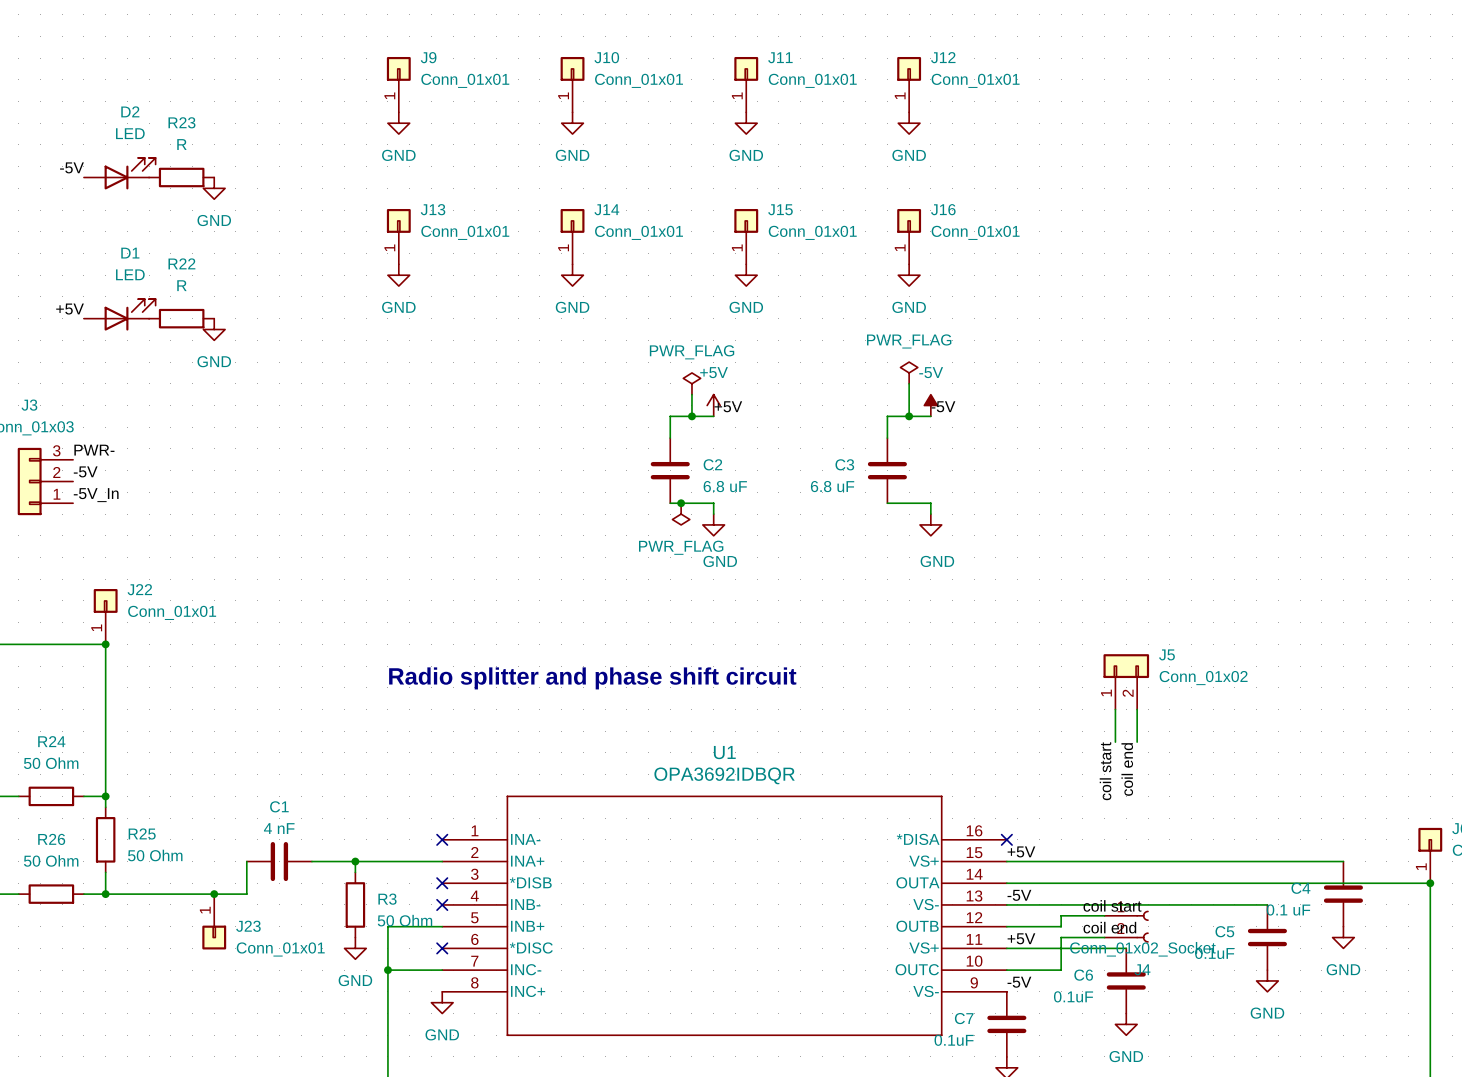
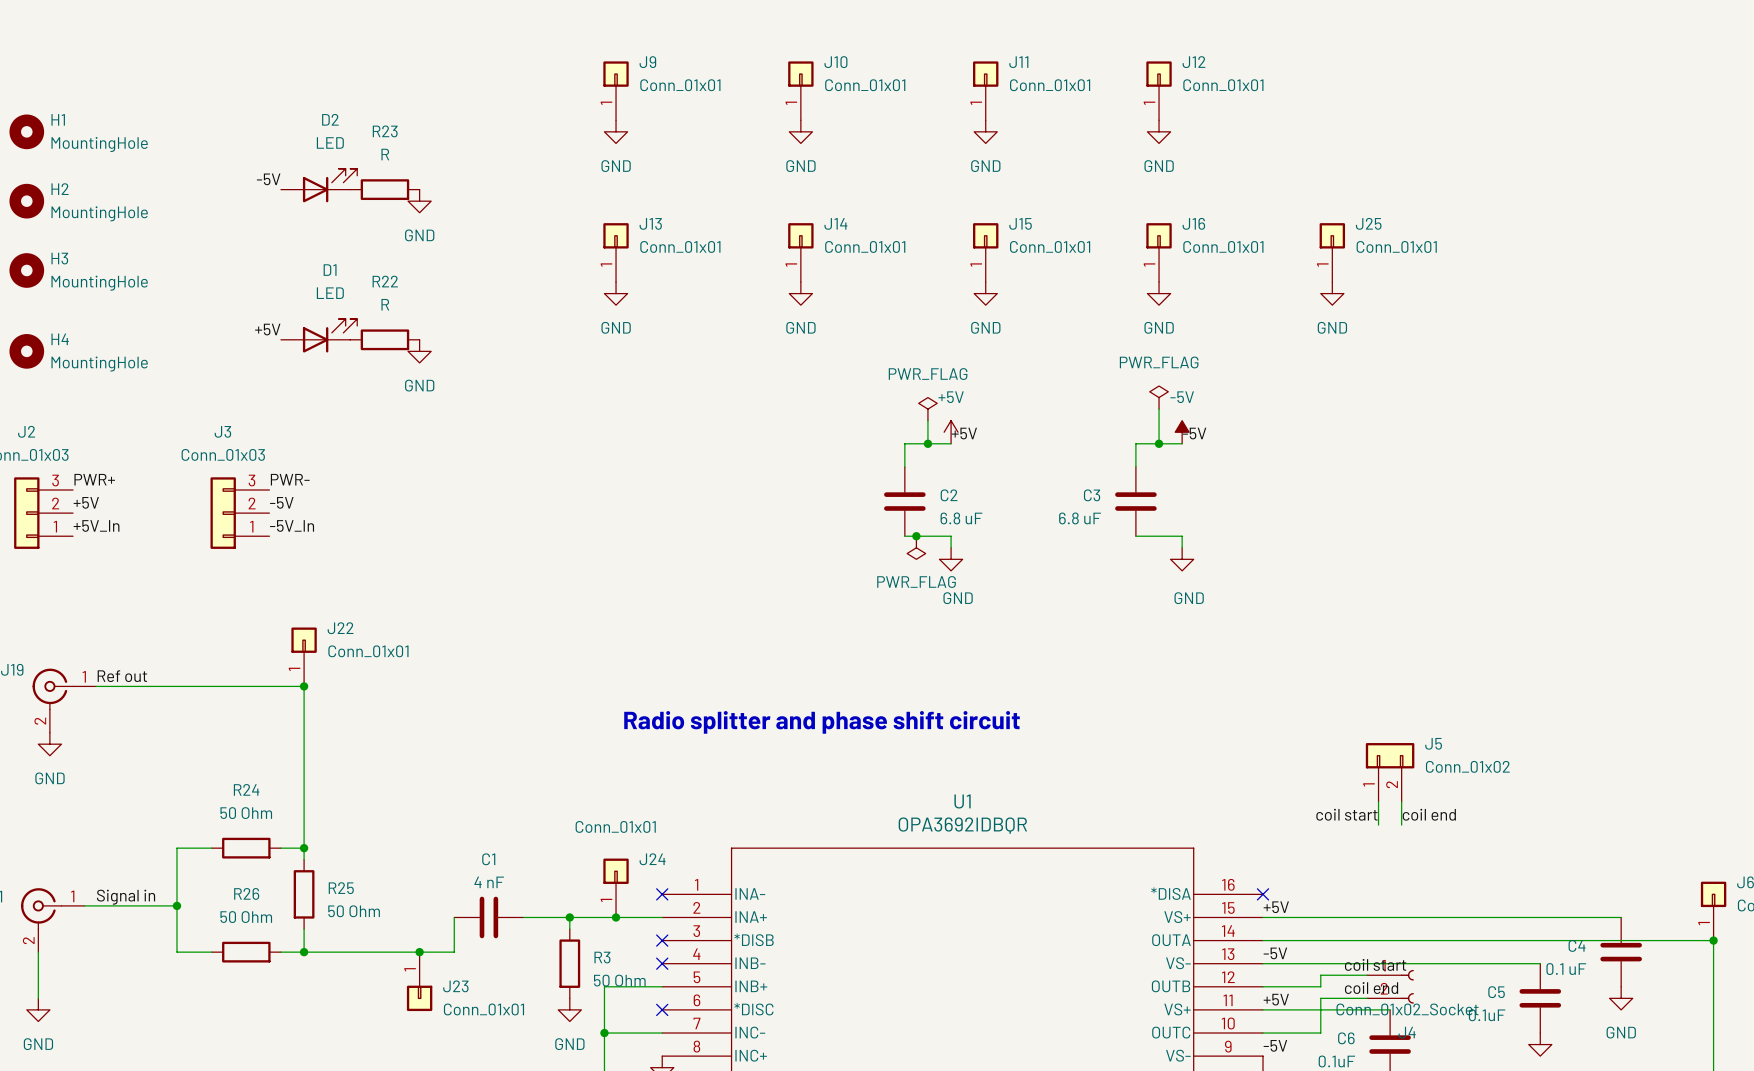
J25: none -> Conn_01x01 (1332, 252)
power symbol: none -> GND (1332, 293)
J5 position: (1126, 681) -> (1390, 772)
wire: none -> (1378, 801) (1378, 825)
wire: none -> (1401, 801) (1401, 825)
label rotation: 0° (1127, 769) -> 90° clockwise (1429, 814)
label rotation: 0° (1105, 771) -> 90° clockwise (1346, 814)
J24: none -> Conn_01x01 (616, 888)
junction: none -> (616, 917)

